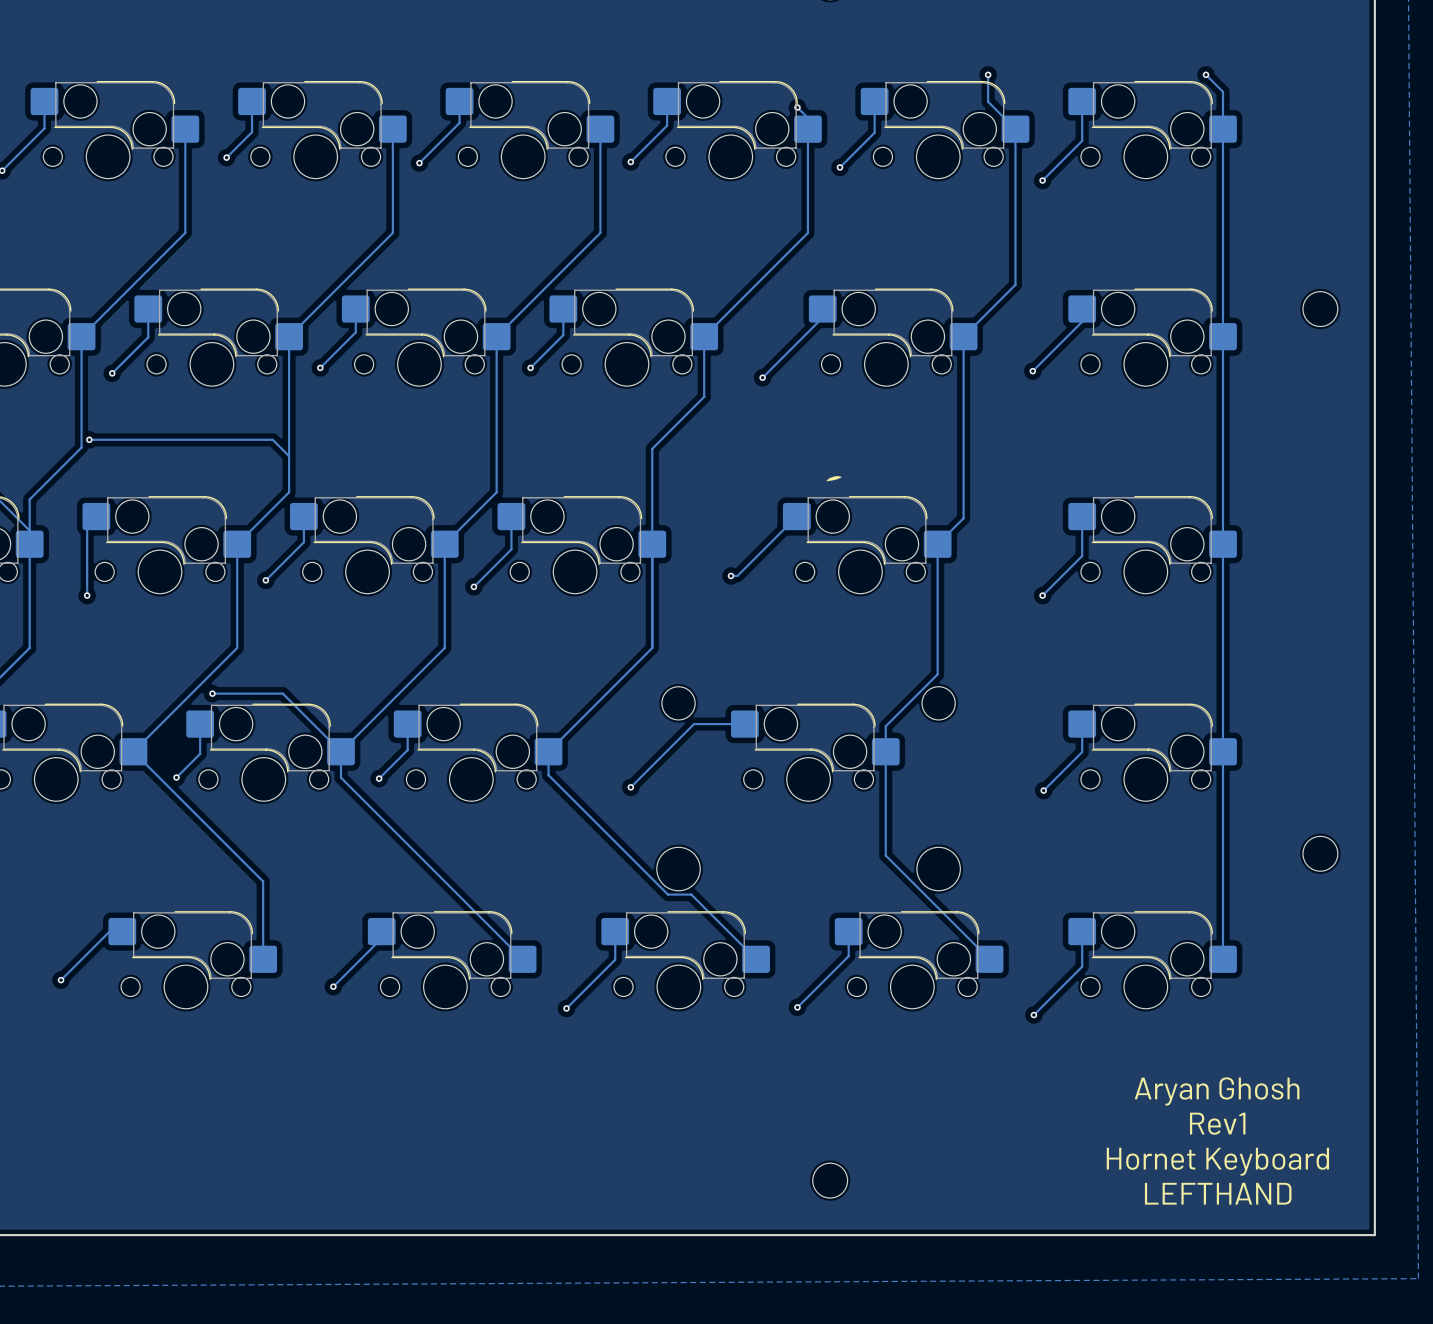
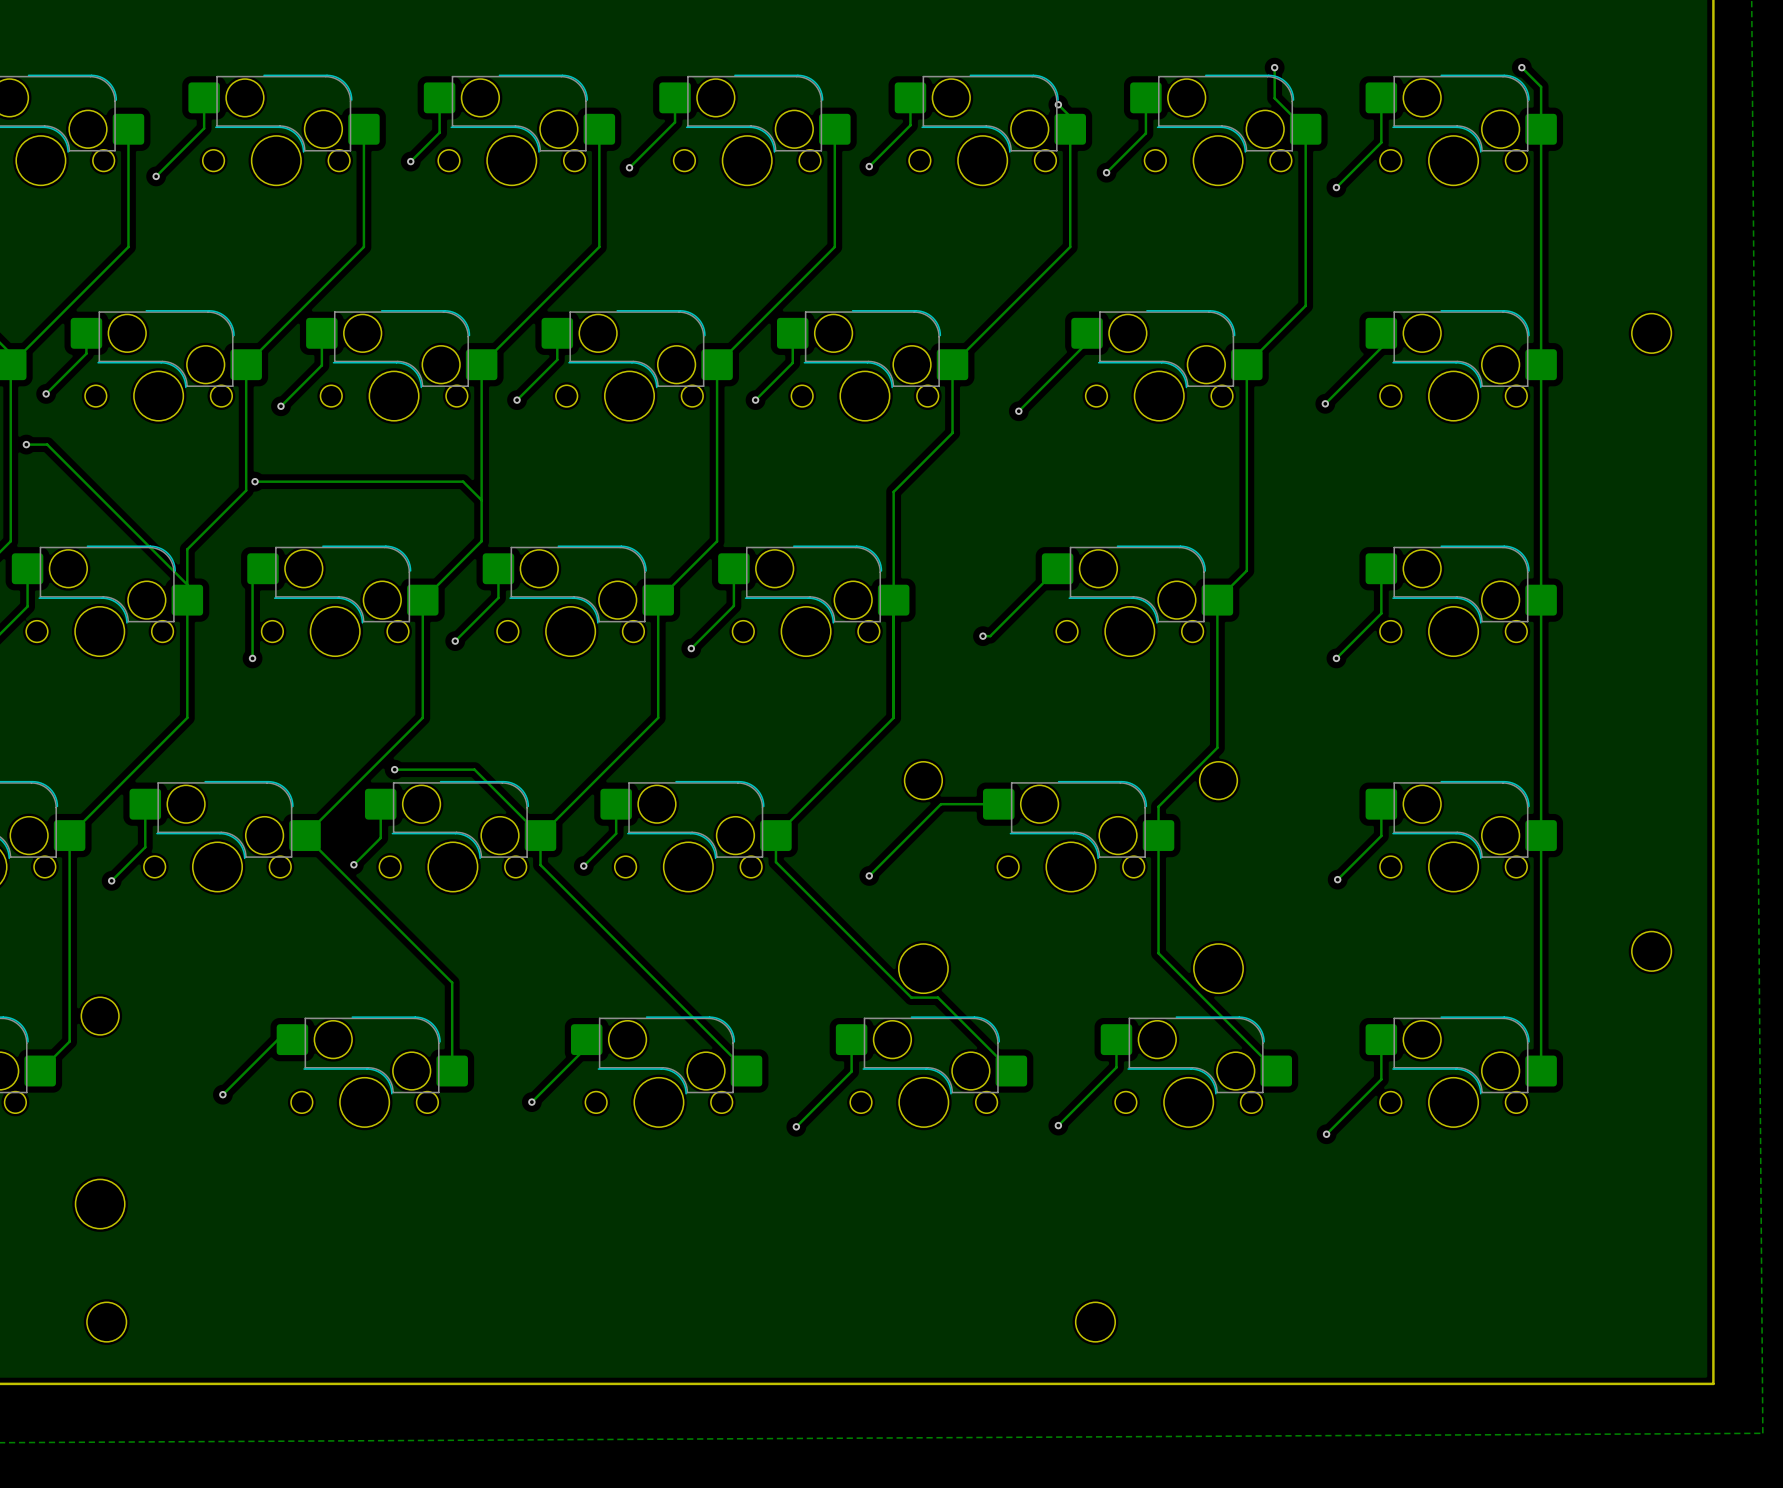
drawing: [826, 476, 842, 482] -> none
text: Aryan Ghosh (1217, 1091) -> none
text: Rev1 (1217, 1123) -> none
text: Hornet Keyboard (1217, 1161) -> none
text: LEFTHAND (1218, 1193) -> none

